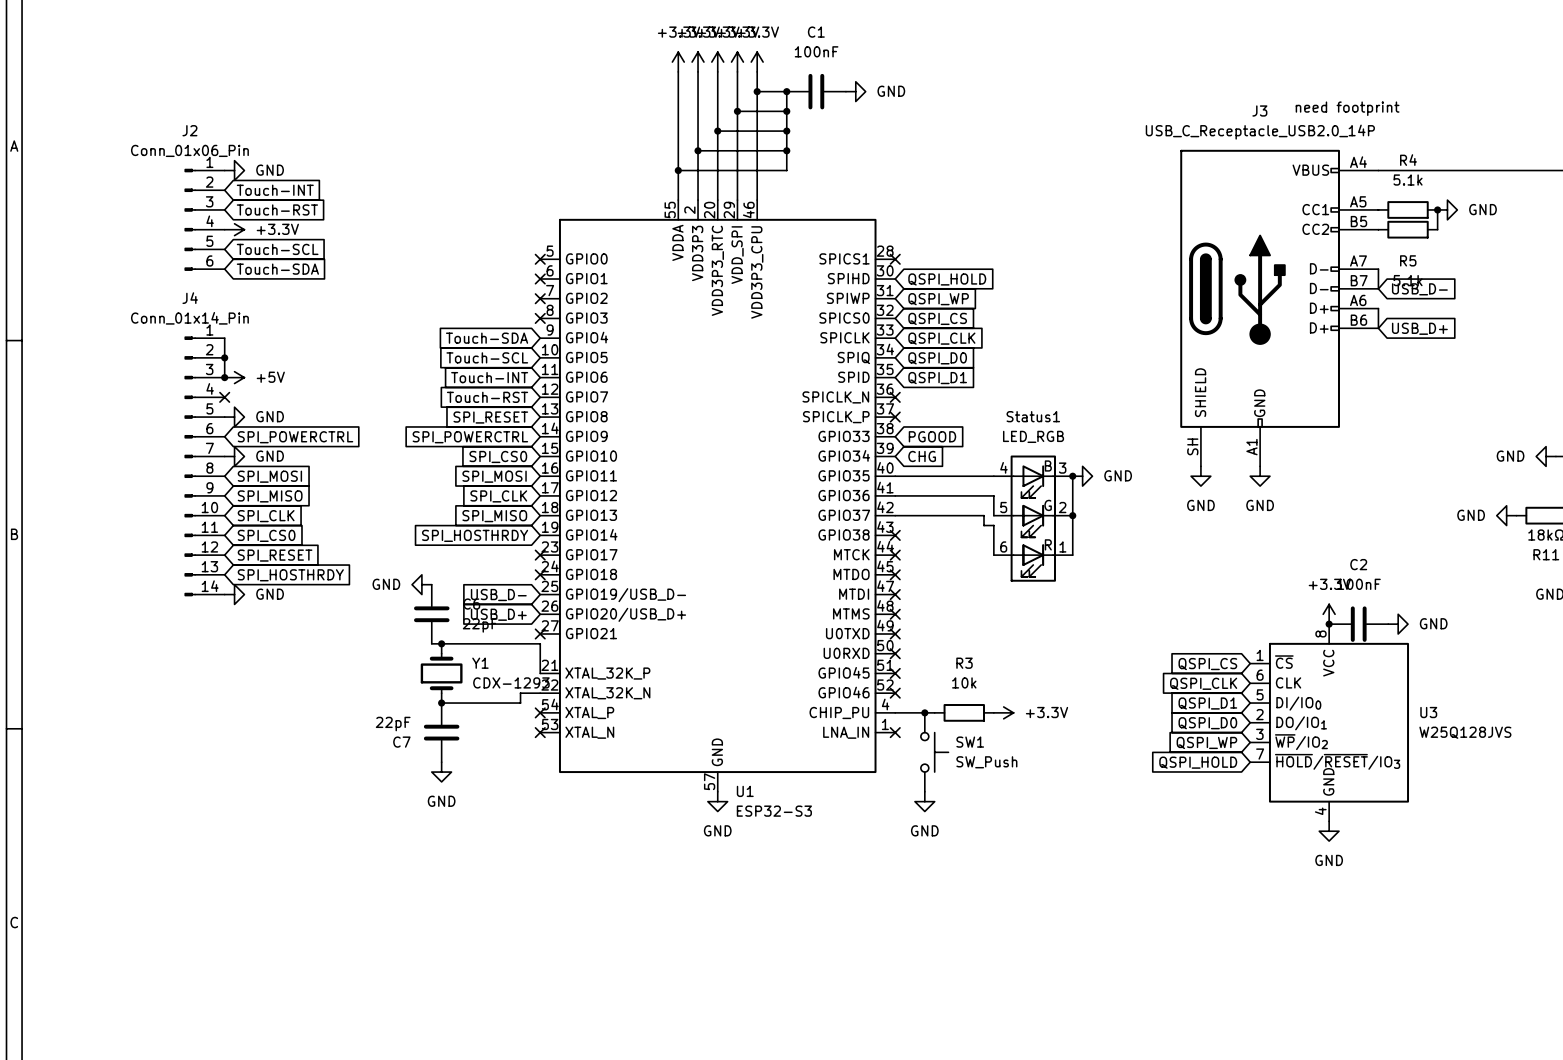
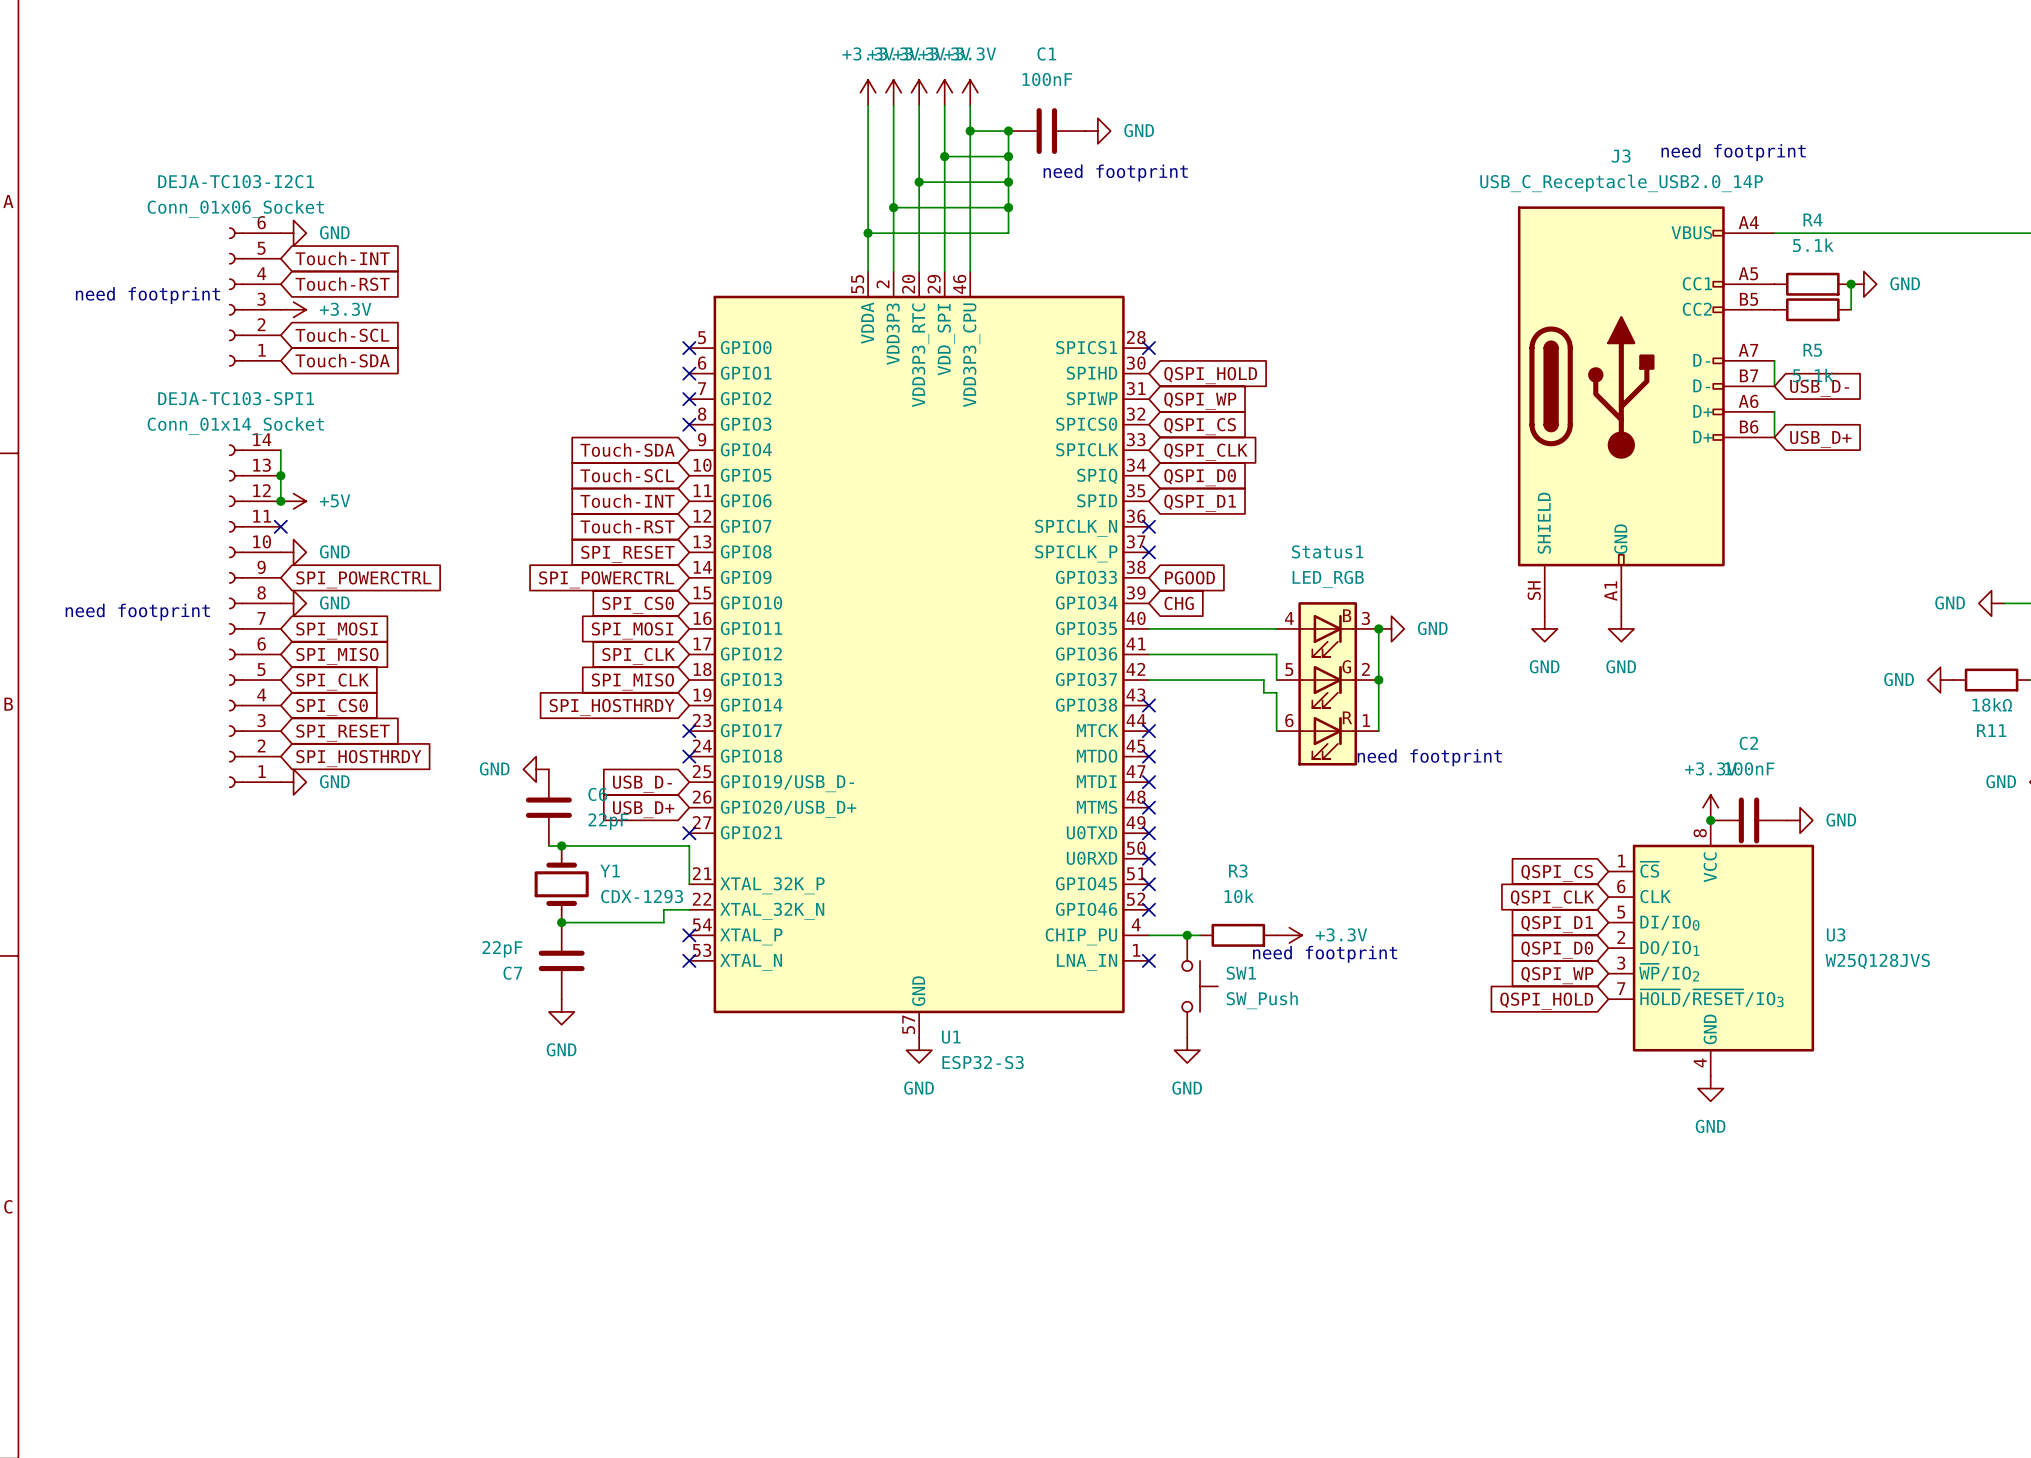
text: none -> need footprint (1115, 173)
text: none -> need footprint (148, 295)
J2: Conn_01x06_Pin (204, 219) -> none
DEJA-TC103-I2C1: none -> Conn_01x06_Socket (254, 297)
text: none -> need footprint (137, 612)
J4: Conn_01x14_Pin (204, 466) -> none
DEJA-TC103-SPI1: none -> Conn_01x14_Socket (254, 616)
text: none -> need footprint (1429, 757)
text: none -> need footprint (1325, 954)

